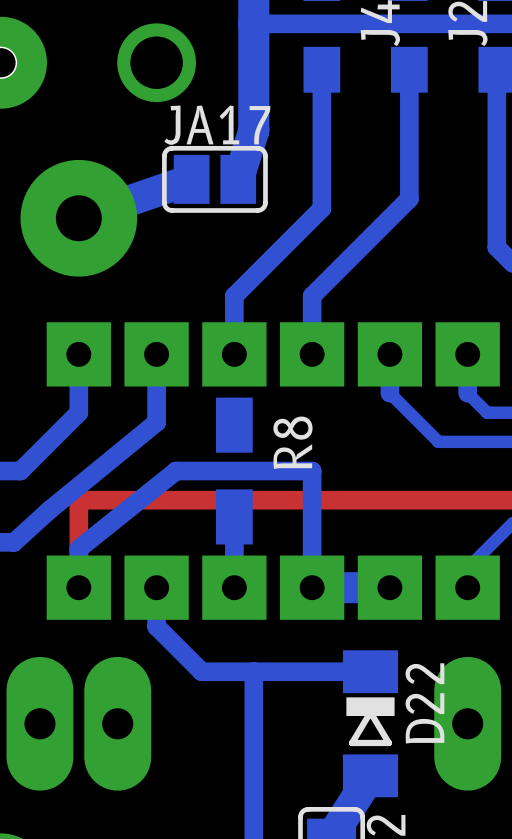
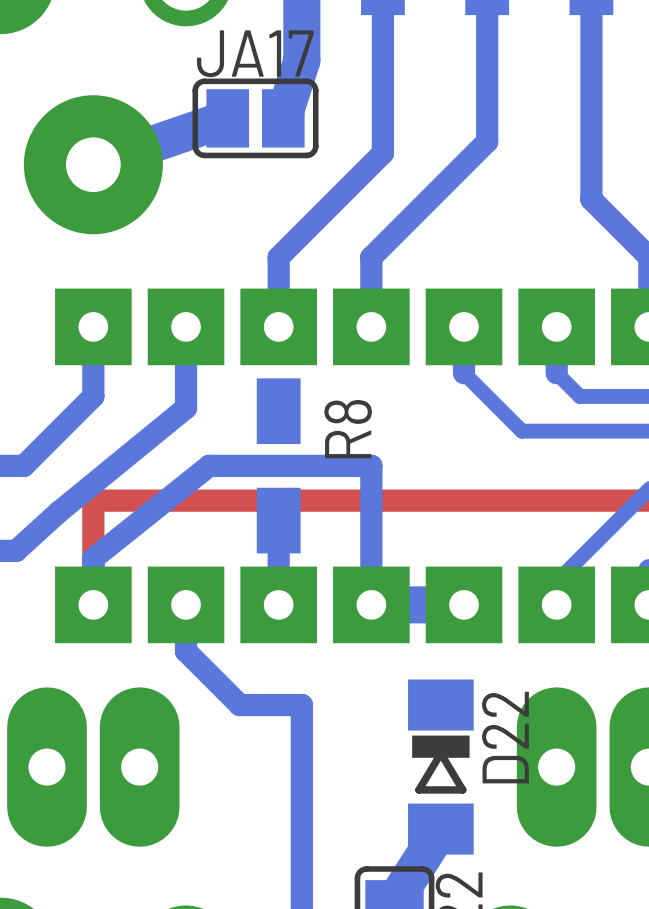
bottom track: (370, 671) (253, 671) -> none

